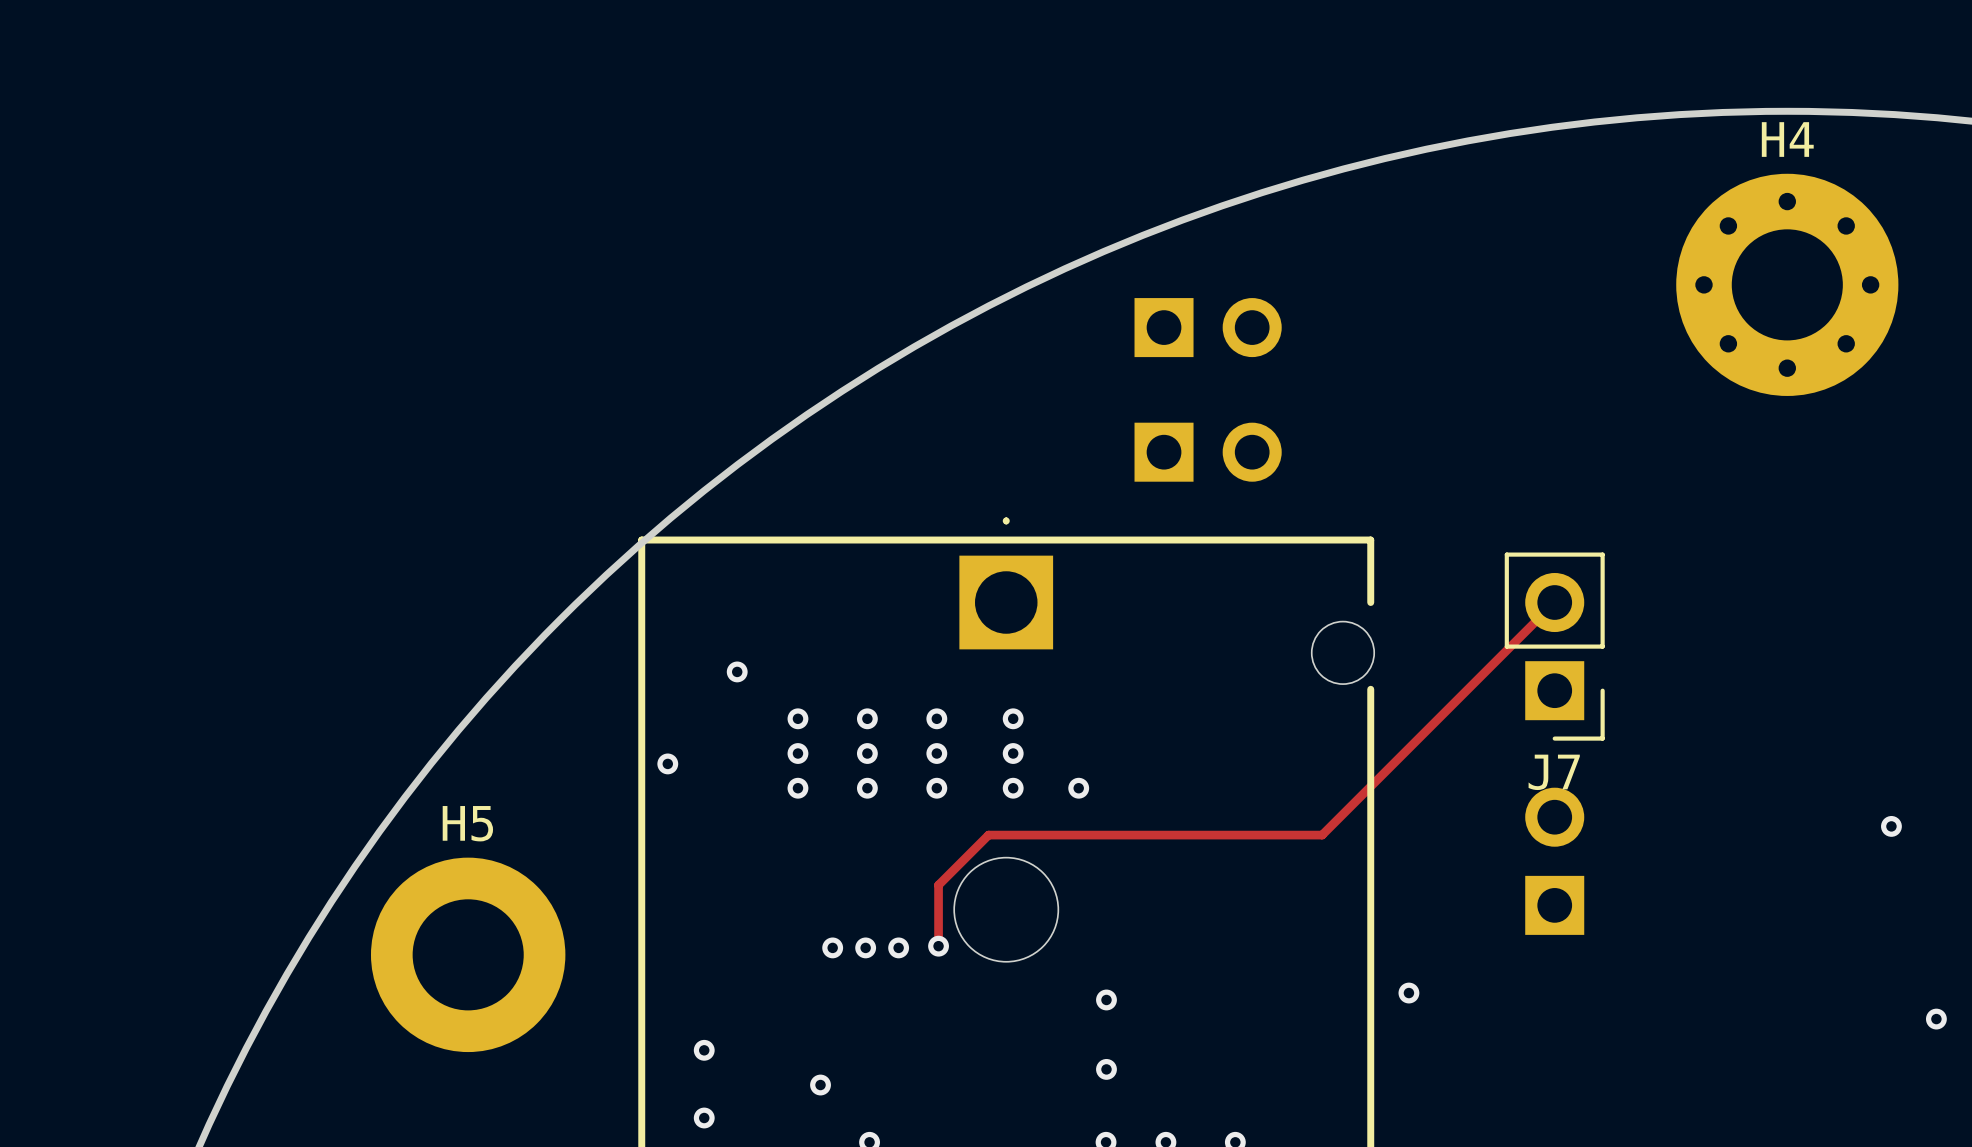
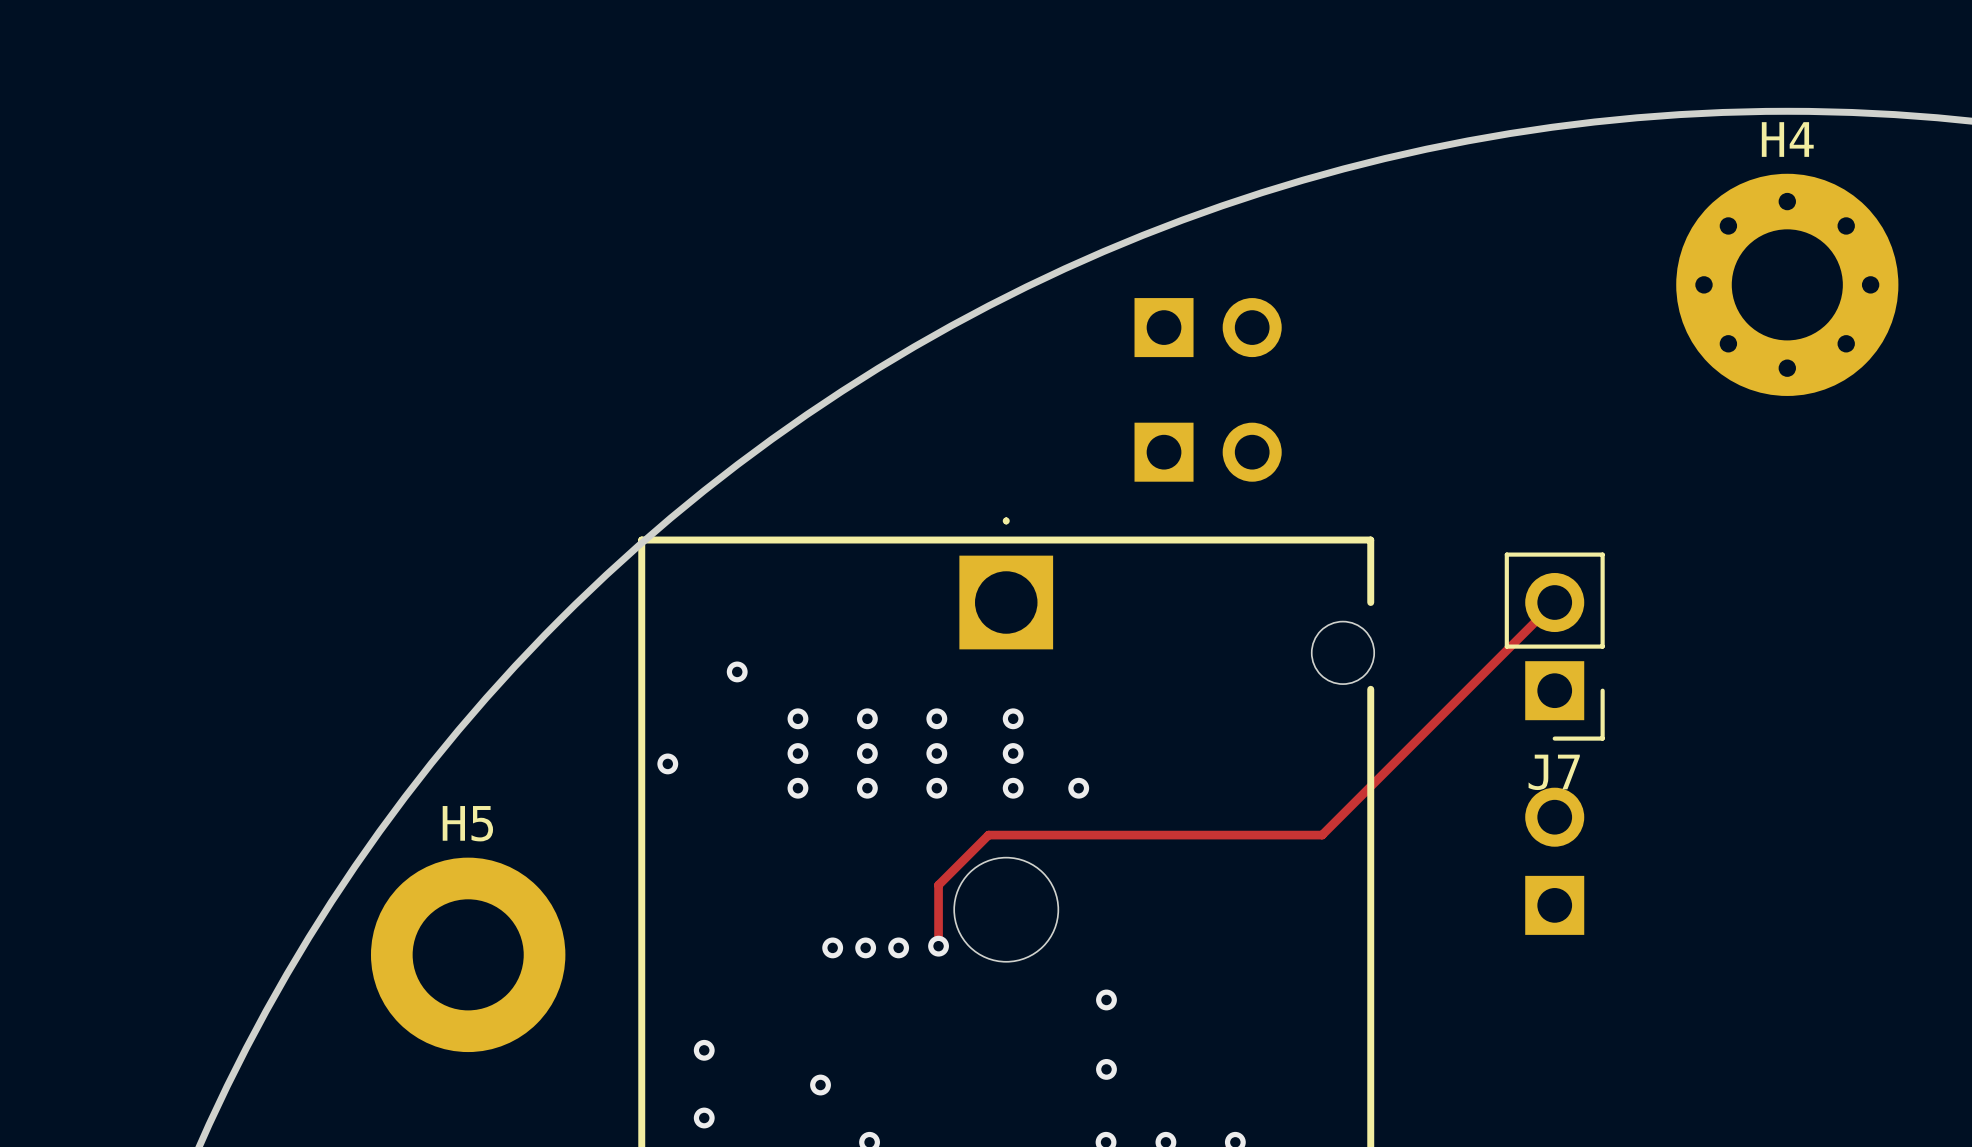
via: (1891, 826) -> none
via: (1408, 993) -> none
via: (1936, 1019) -> none

